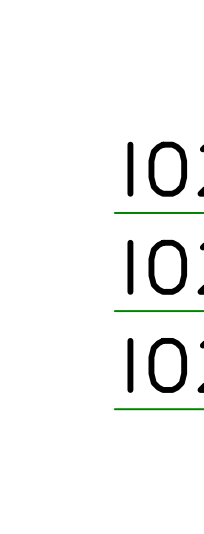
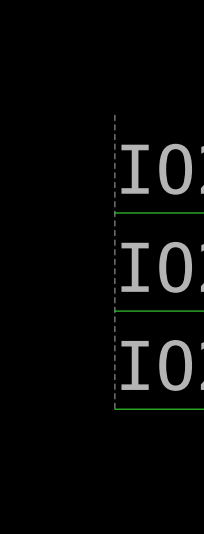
line: none -> (114, 114) (114, 409)

